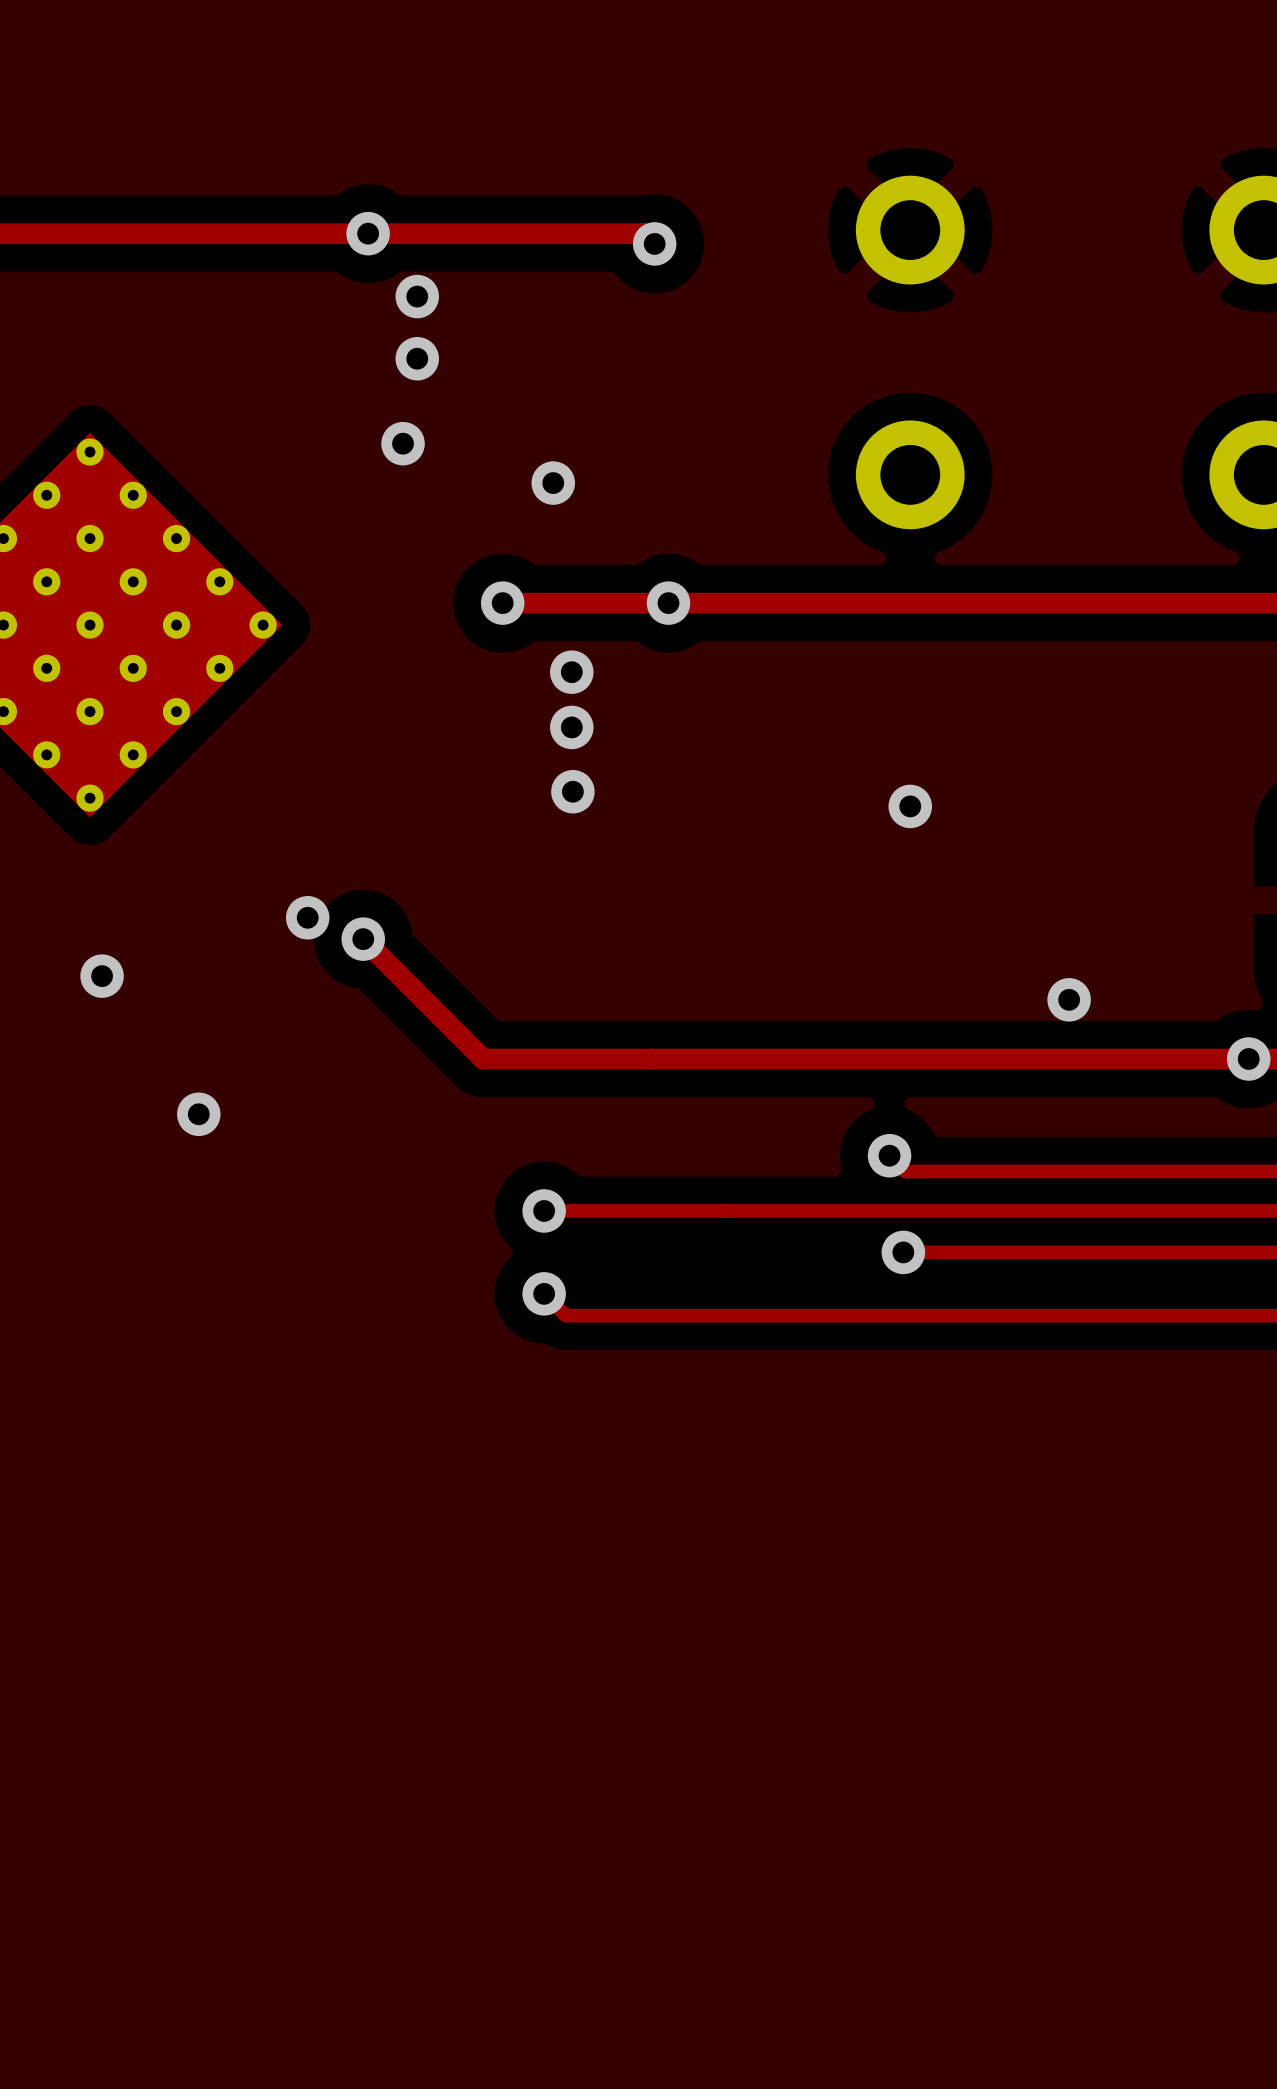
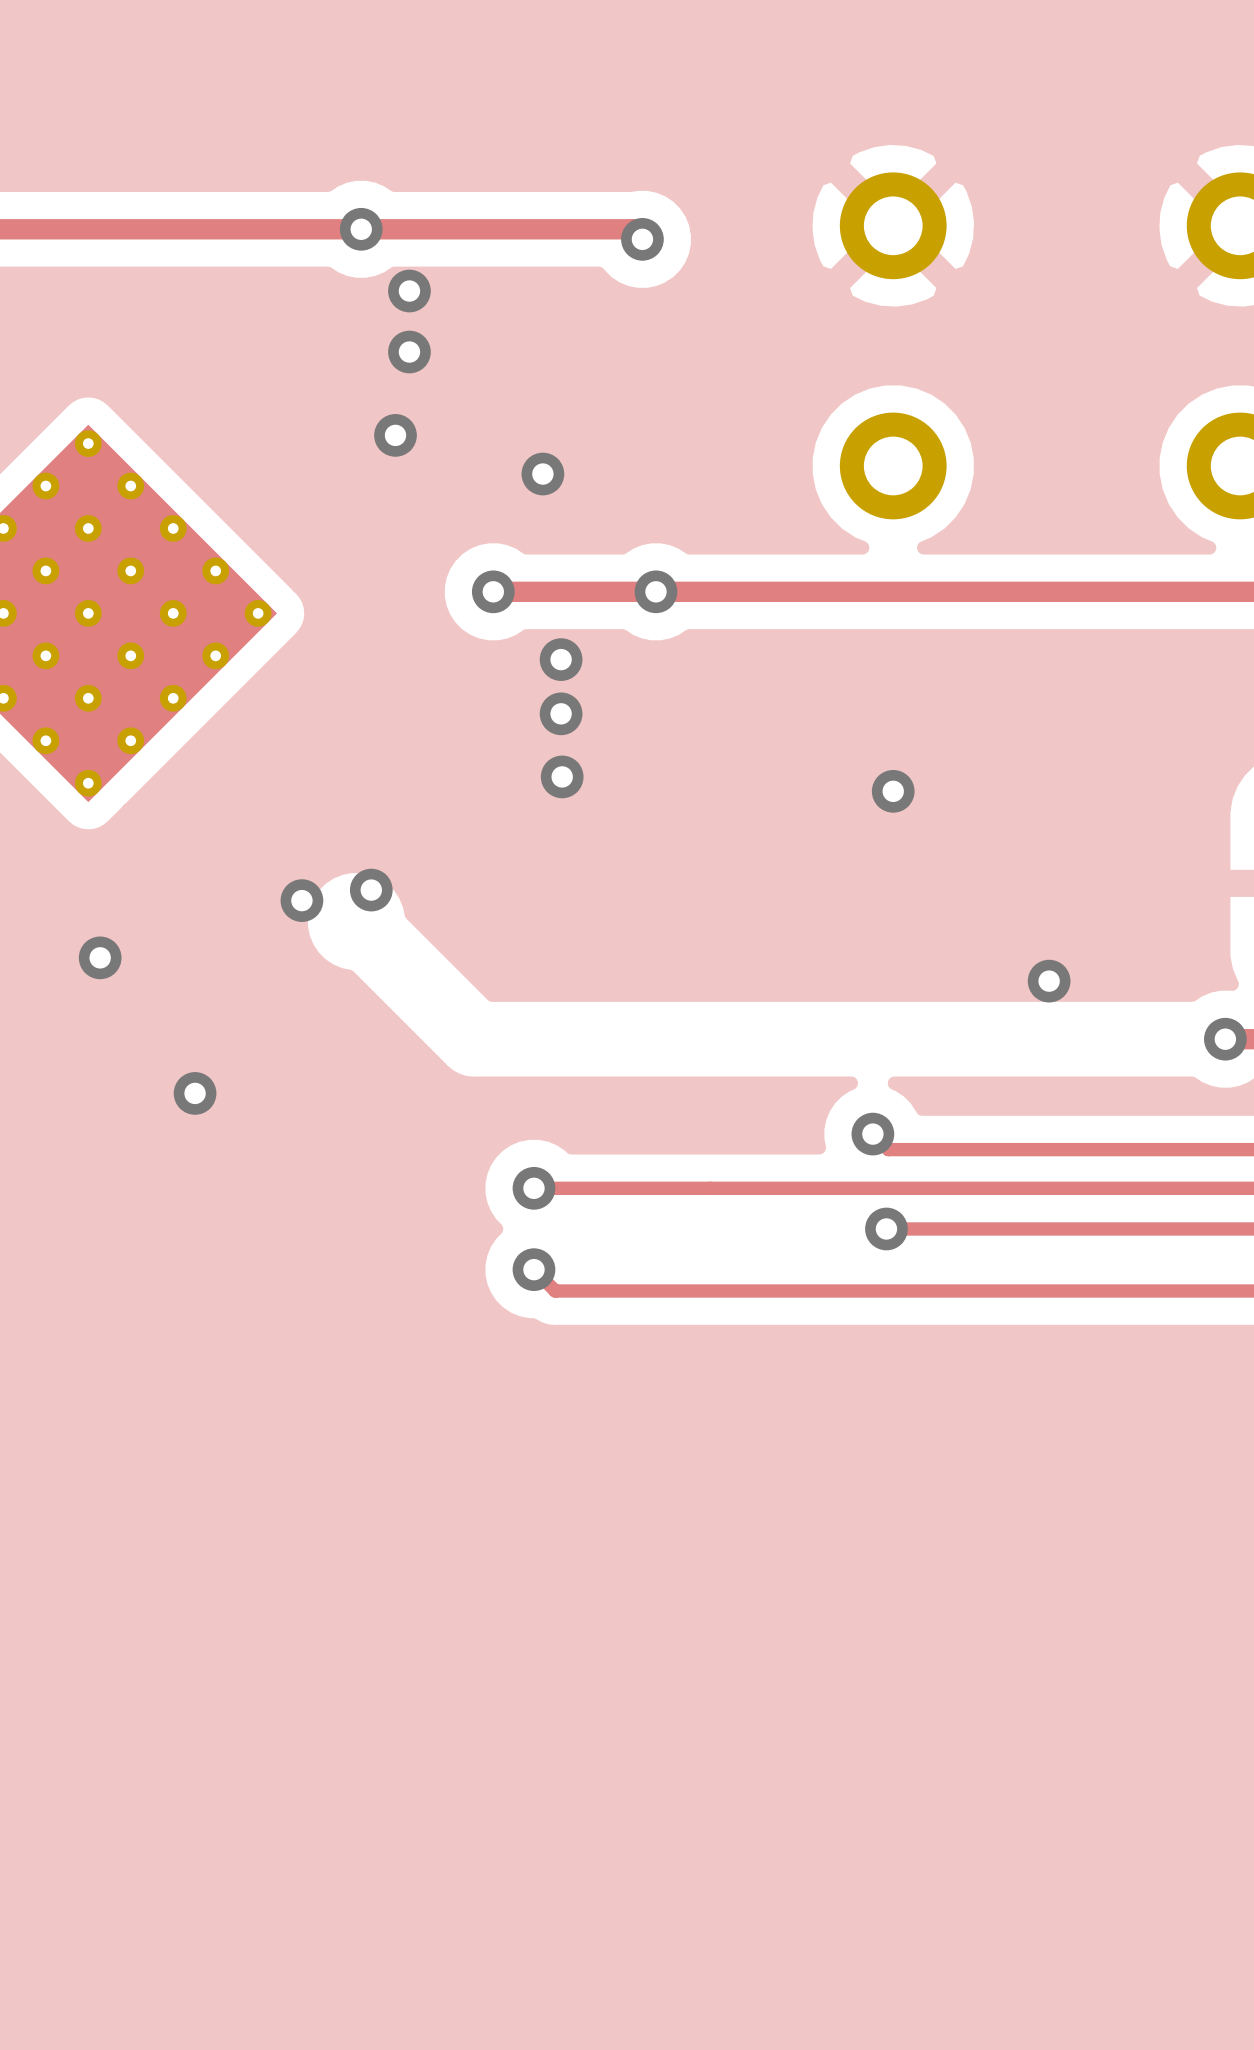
via position: (363, 939) -> (371, 890)
track: (479, 1055) (363, 939) (483, 1059) (1248, 1059) -> none

